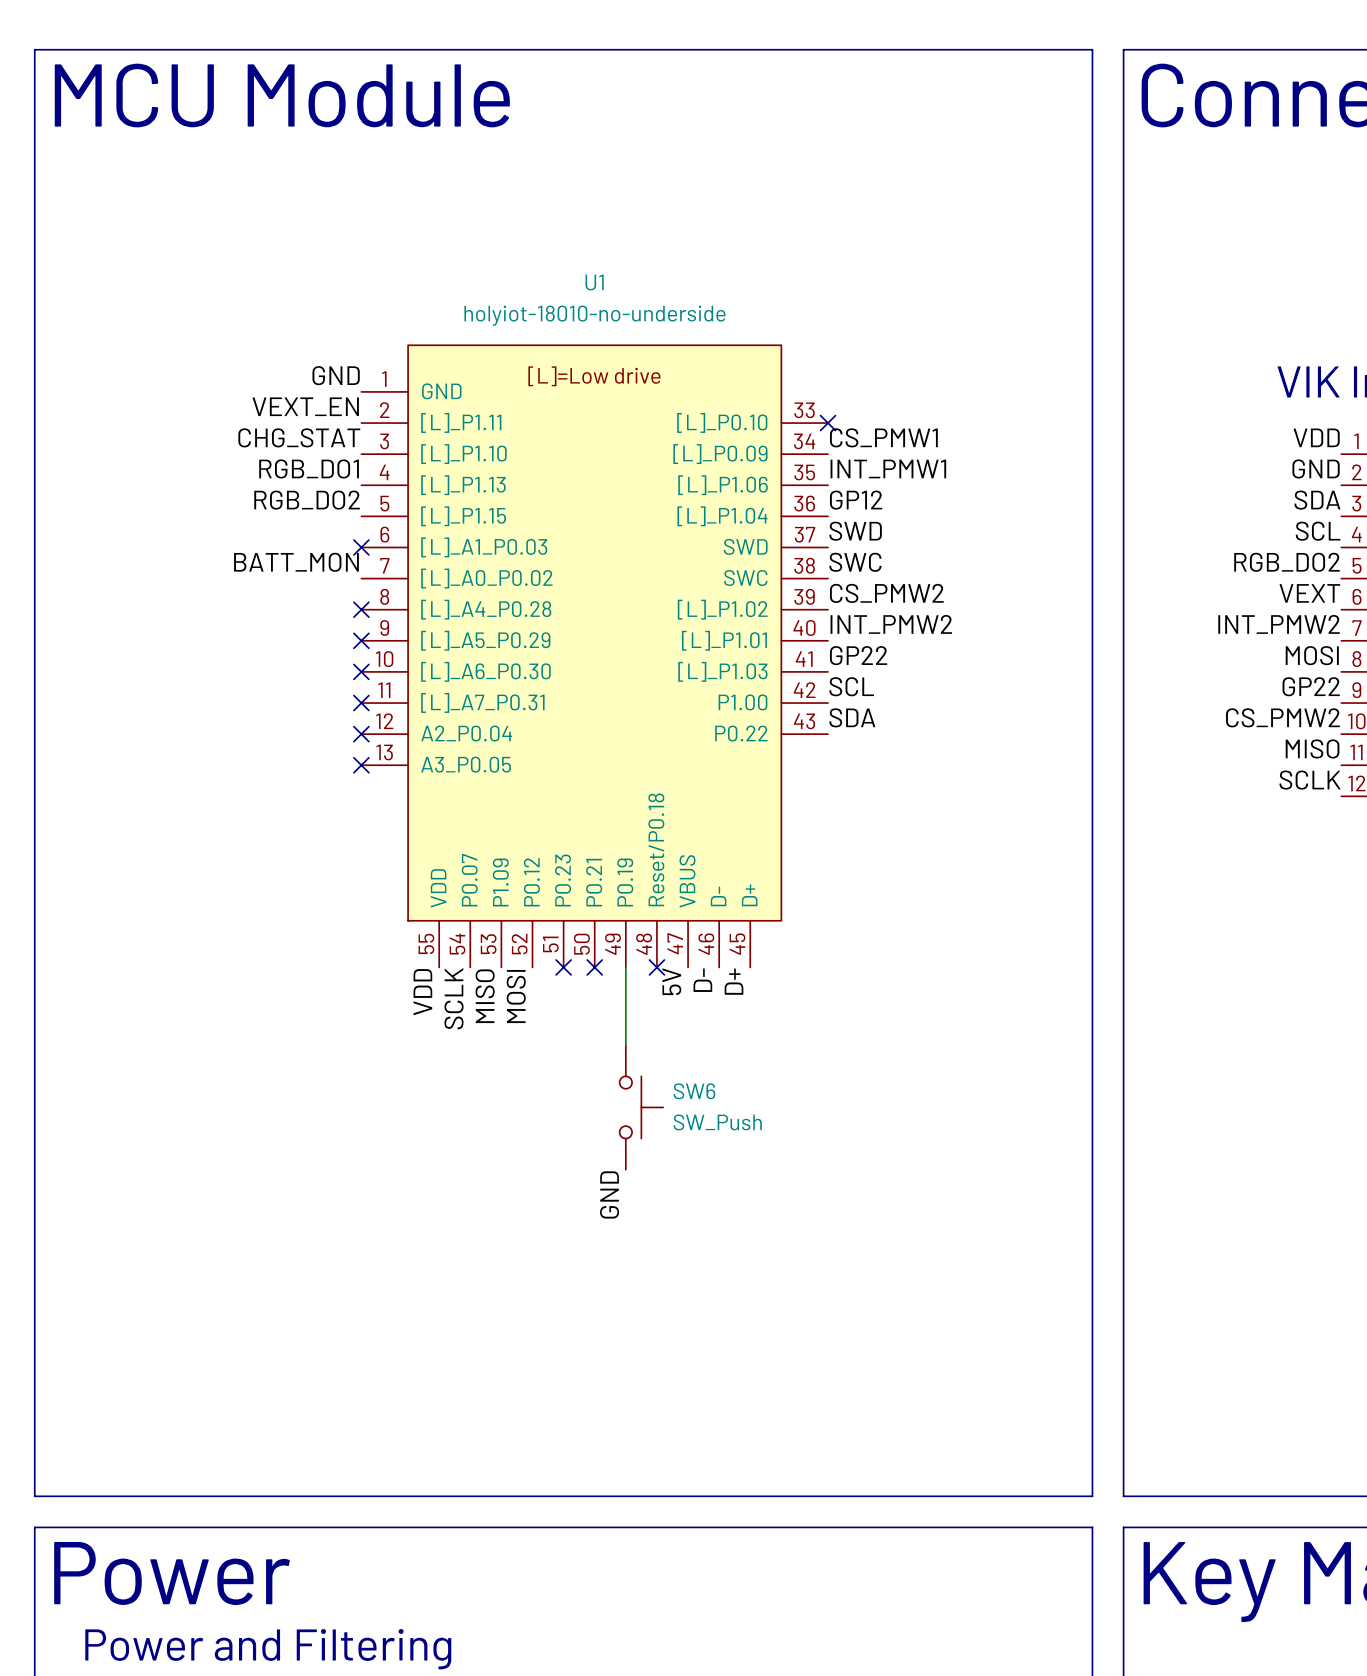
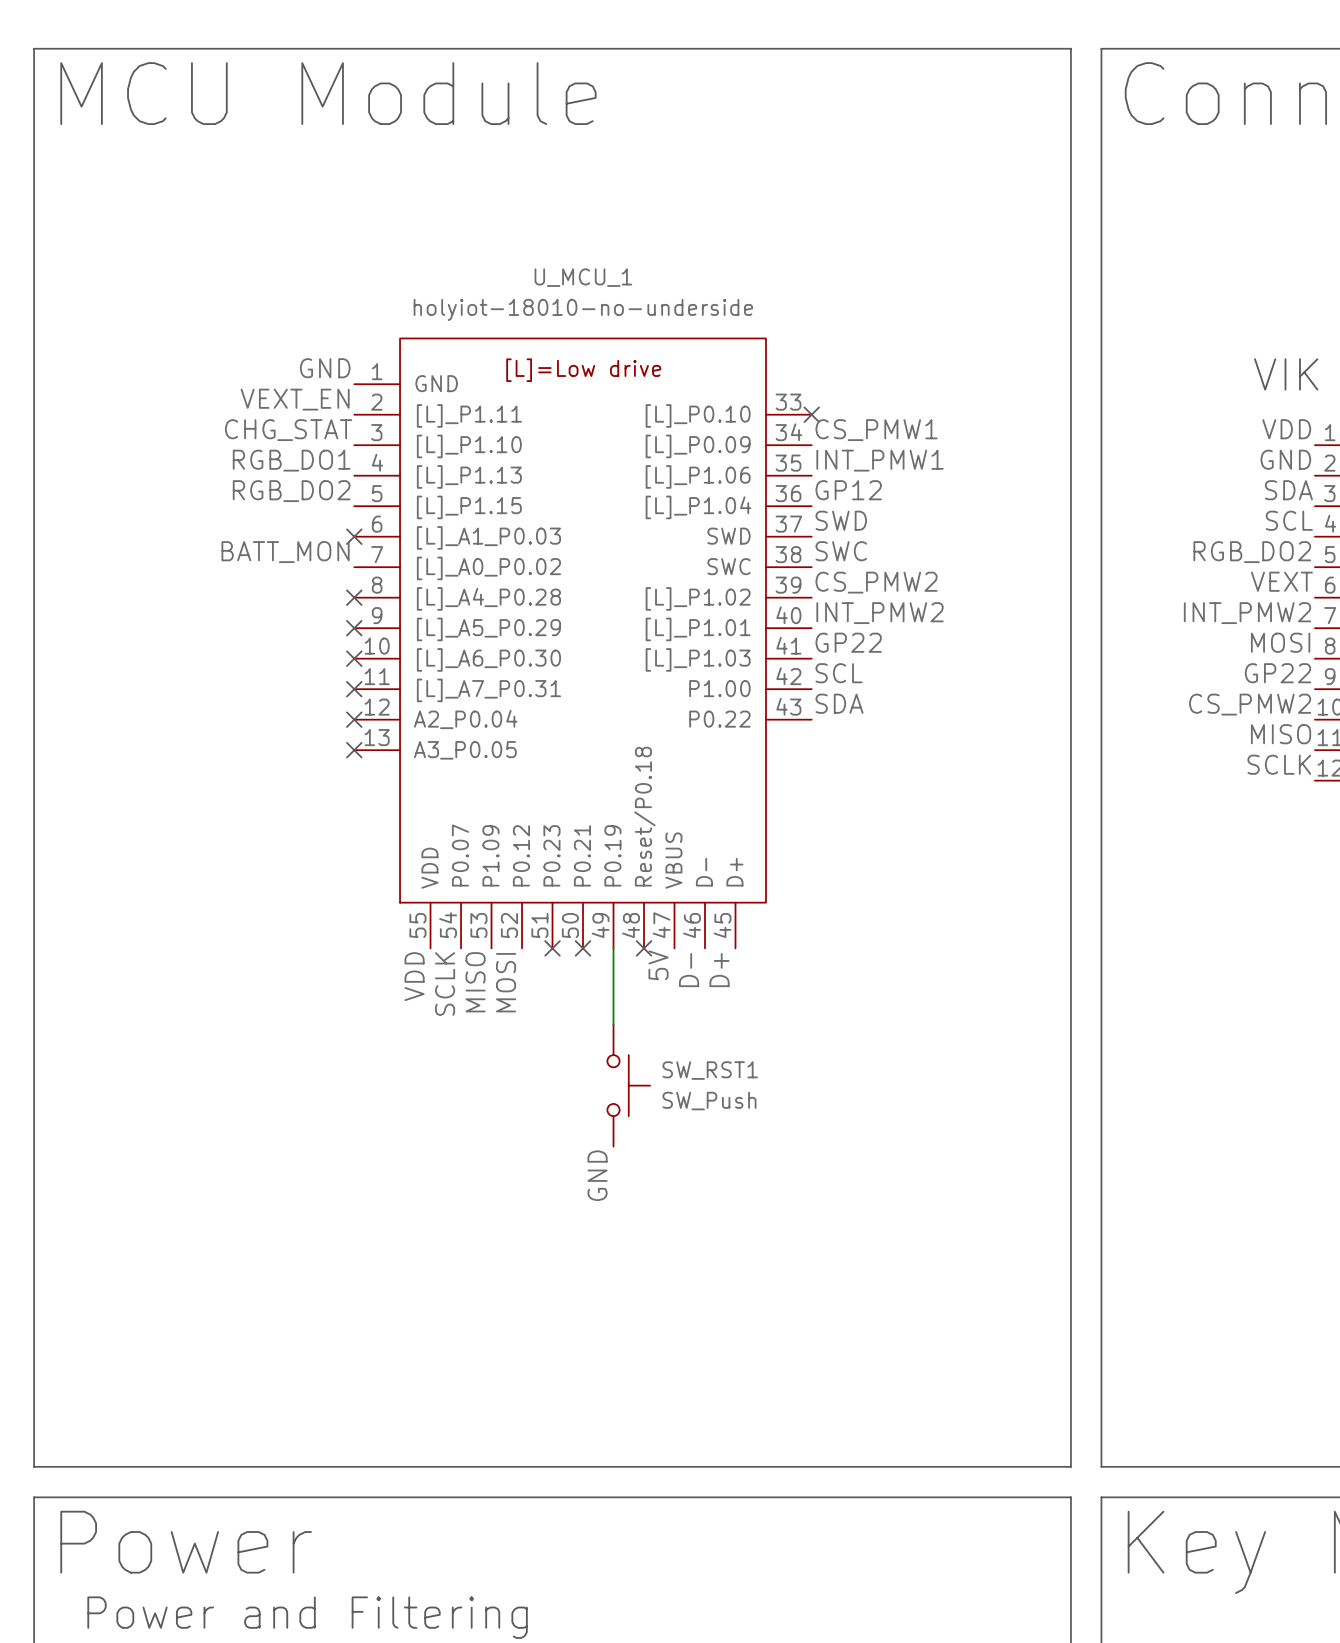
U1 name: U1 (594, 282) -> U_MCU_1 (583, 277)
SW6 name: SW6 (694, 1091) -> SW_RST1 (710, 1070)

